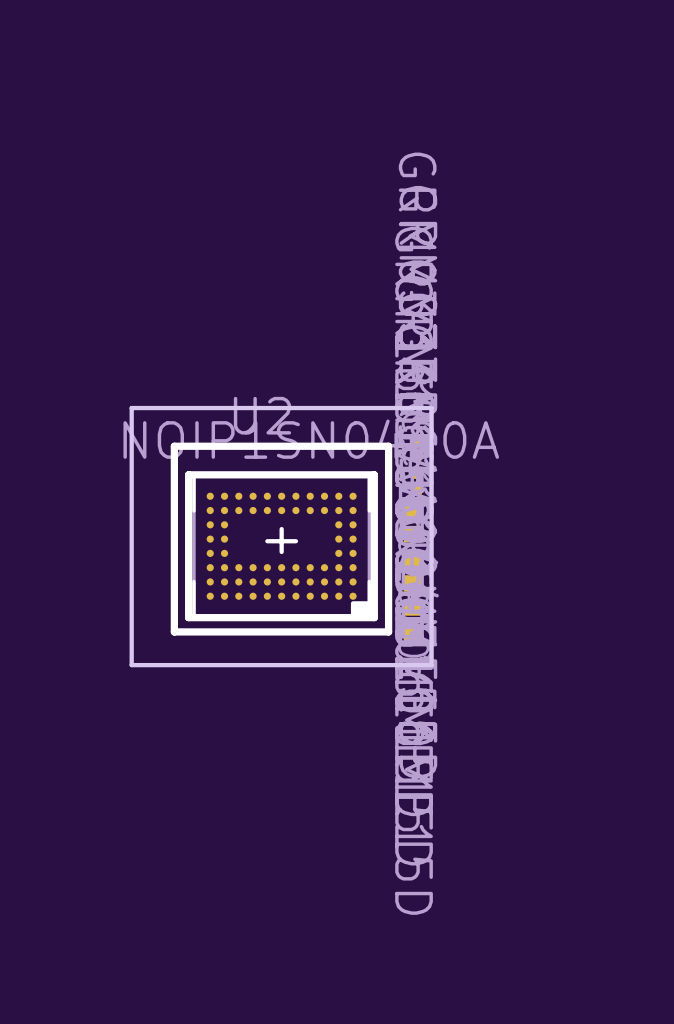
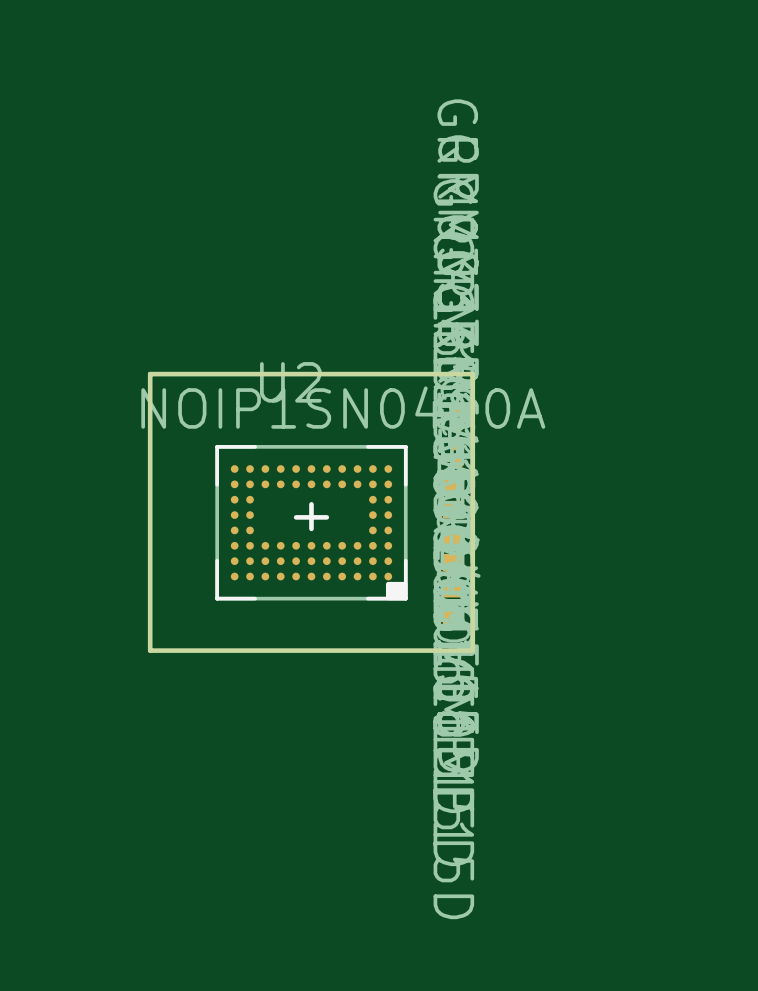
line: (388, 446) (174, 446) (174, 631) (388, 631) (388, 446) -> none
line: (374, 474) (374, 617) (188, 617) (188, 474) (374, 474) -> none

